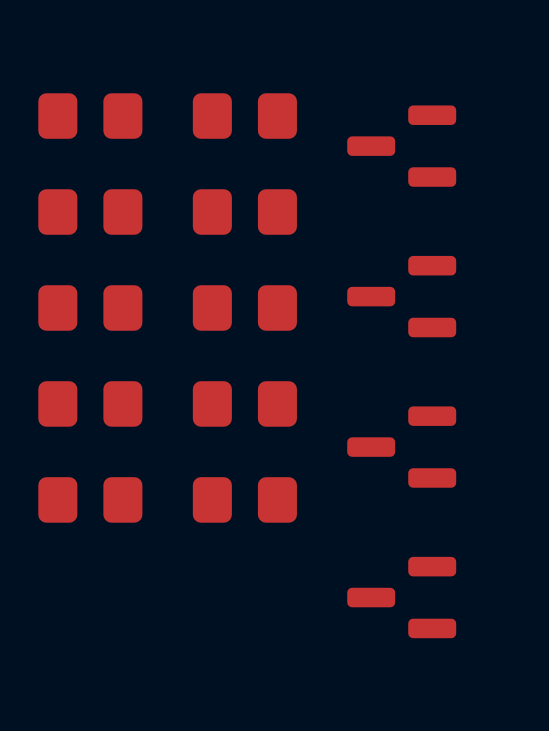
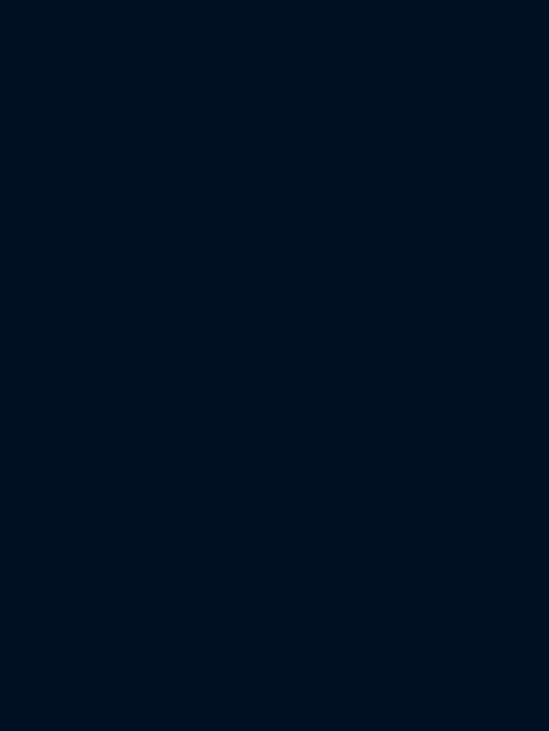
part: (90, 116) -> none
part: (244, 116) -> none
part: (401, 146) -> none
part: (90, 212) -> none
part: (244, 212) -> none
part: (401, 296) -> none
part: (90, 307) -> none
part: (244, 307) -> none
part: (90, 403) -> none
part: (244, 403) -> none
part: (401, 447) -> none
part: (90, 499) -> none
part: (244, 499) -> none
part: (401, 597) -> none

